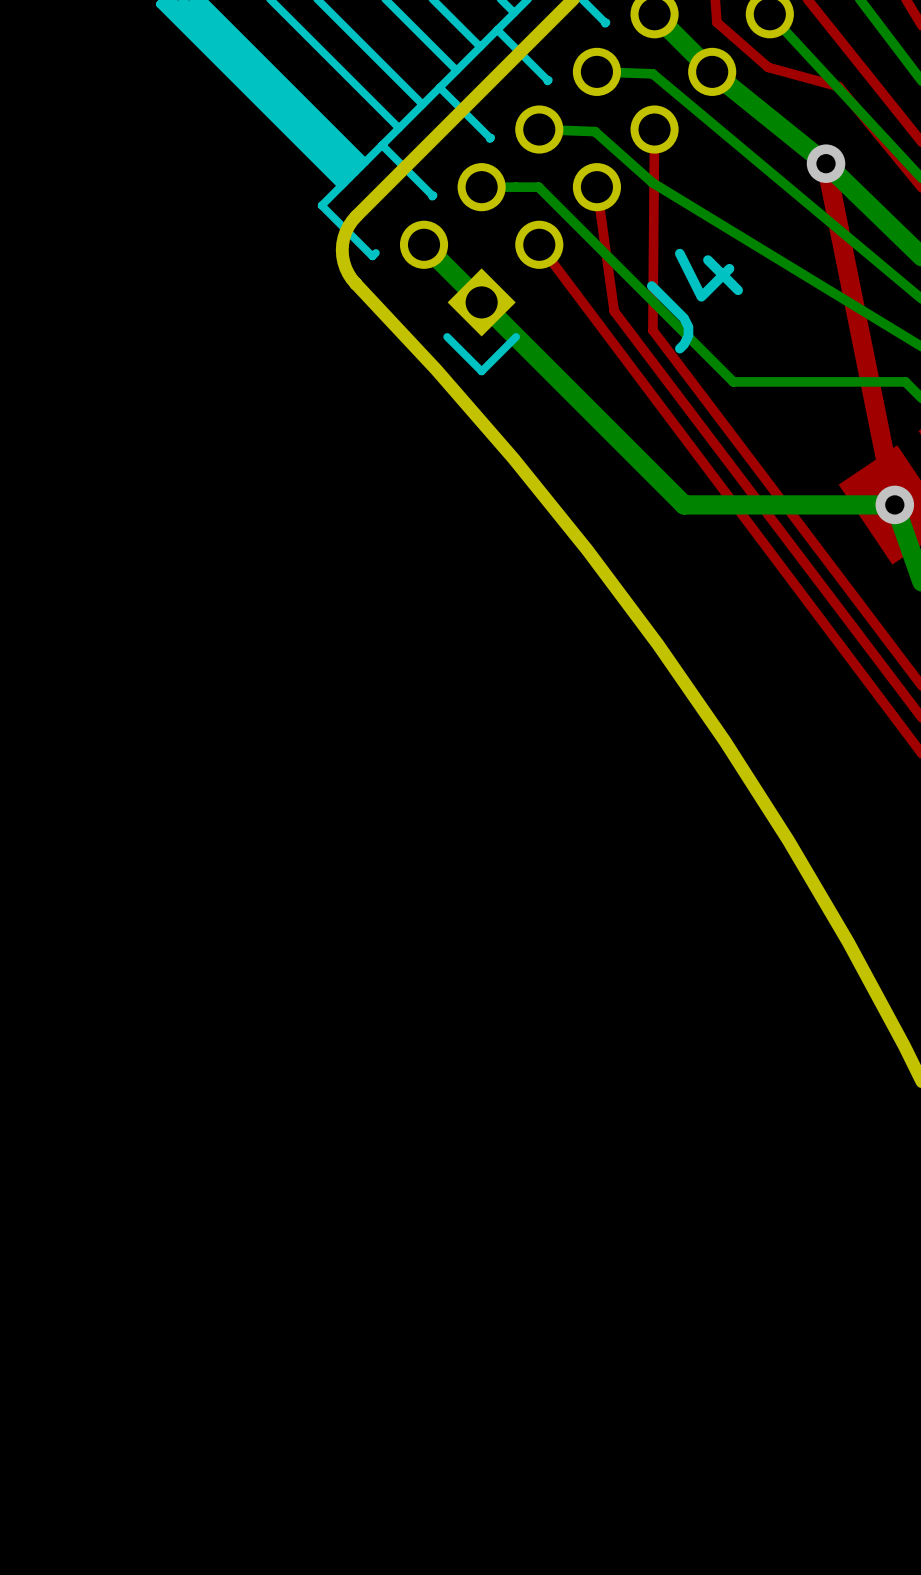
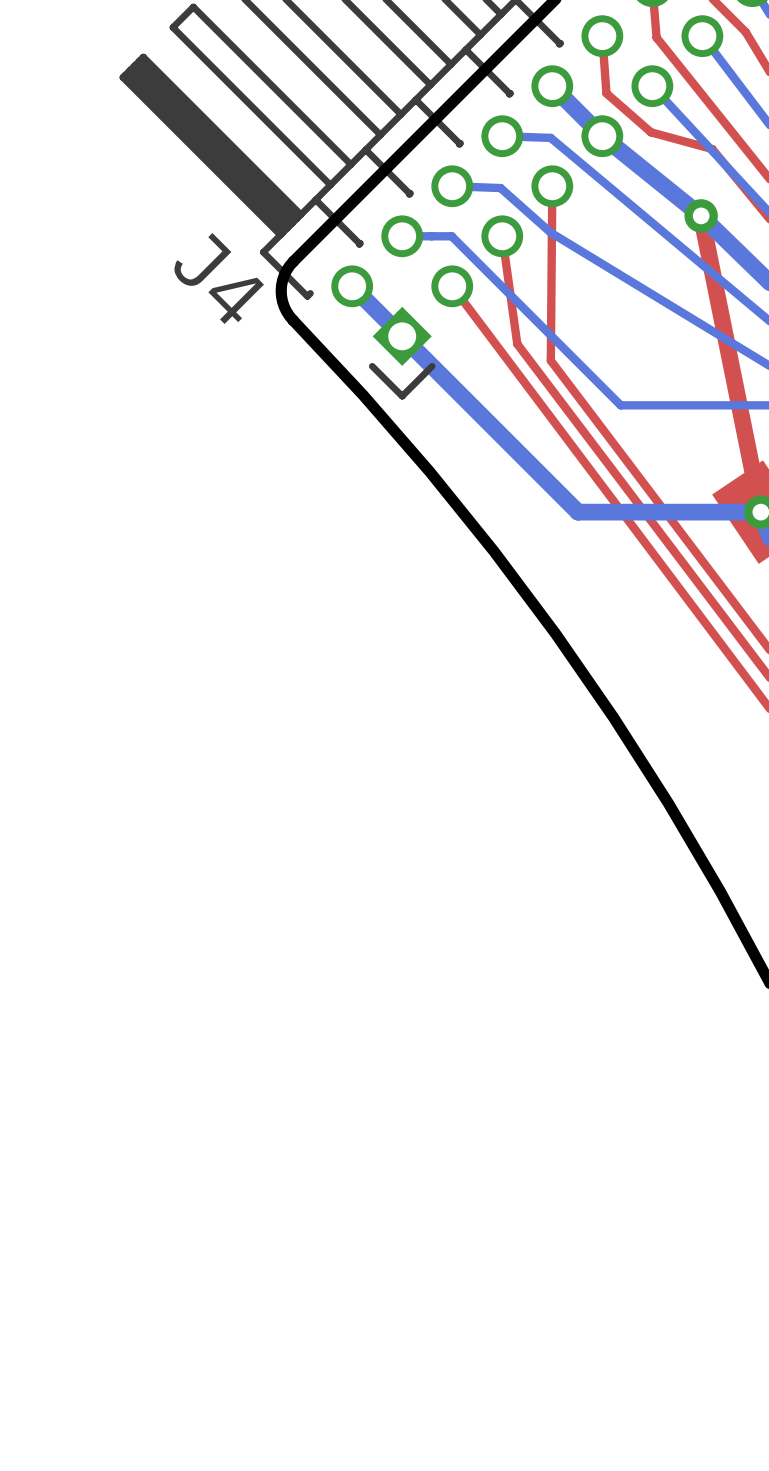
J4 name rotation: 0° (694, 301) -> 90° clockwise (218, 278)
J4 name position: J4 (694, 301) -> J4 (218, 278)

